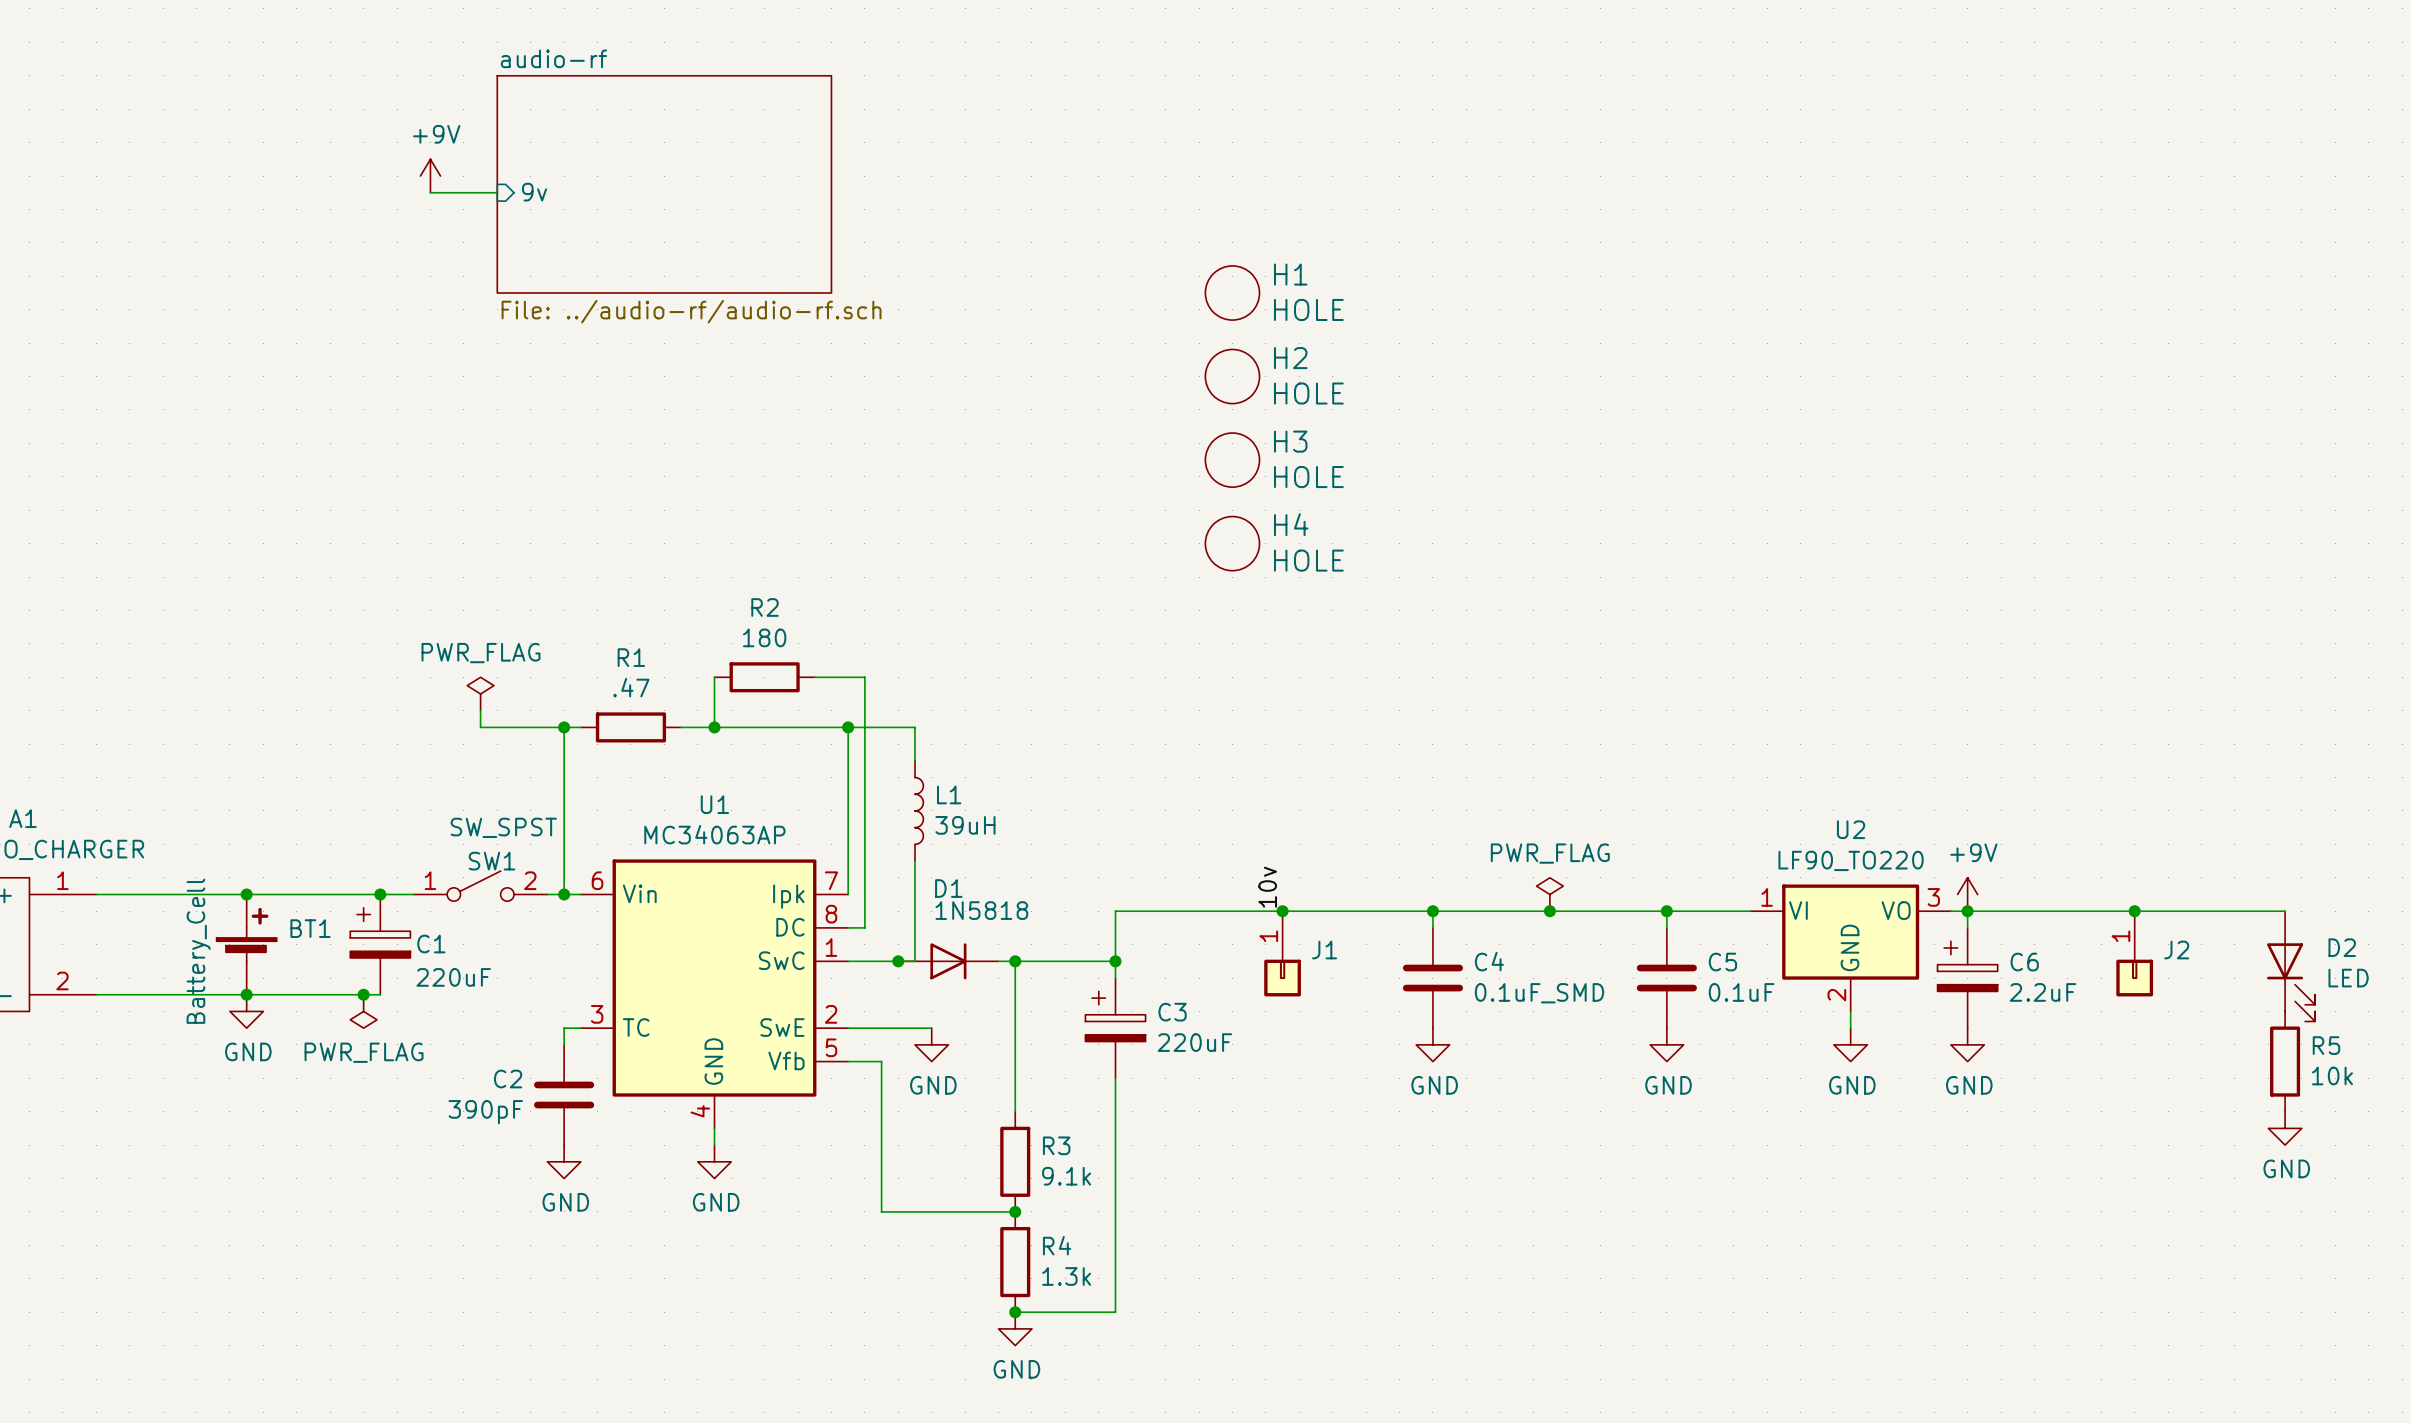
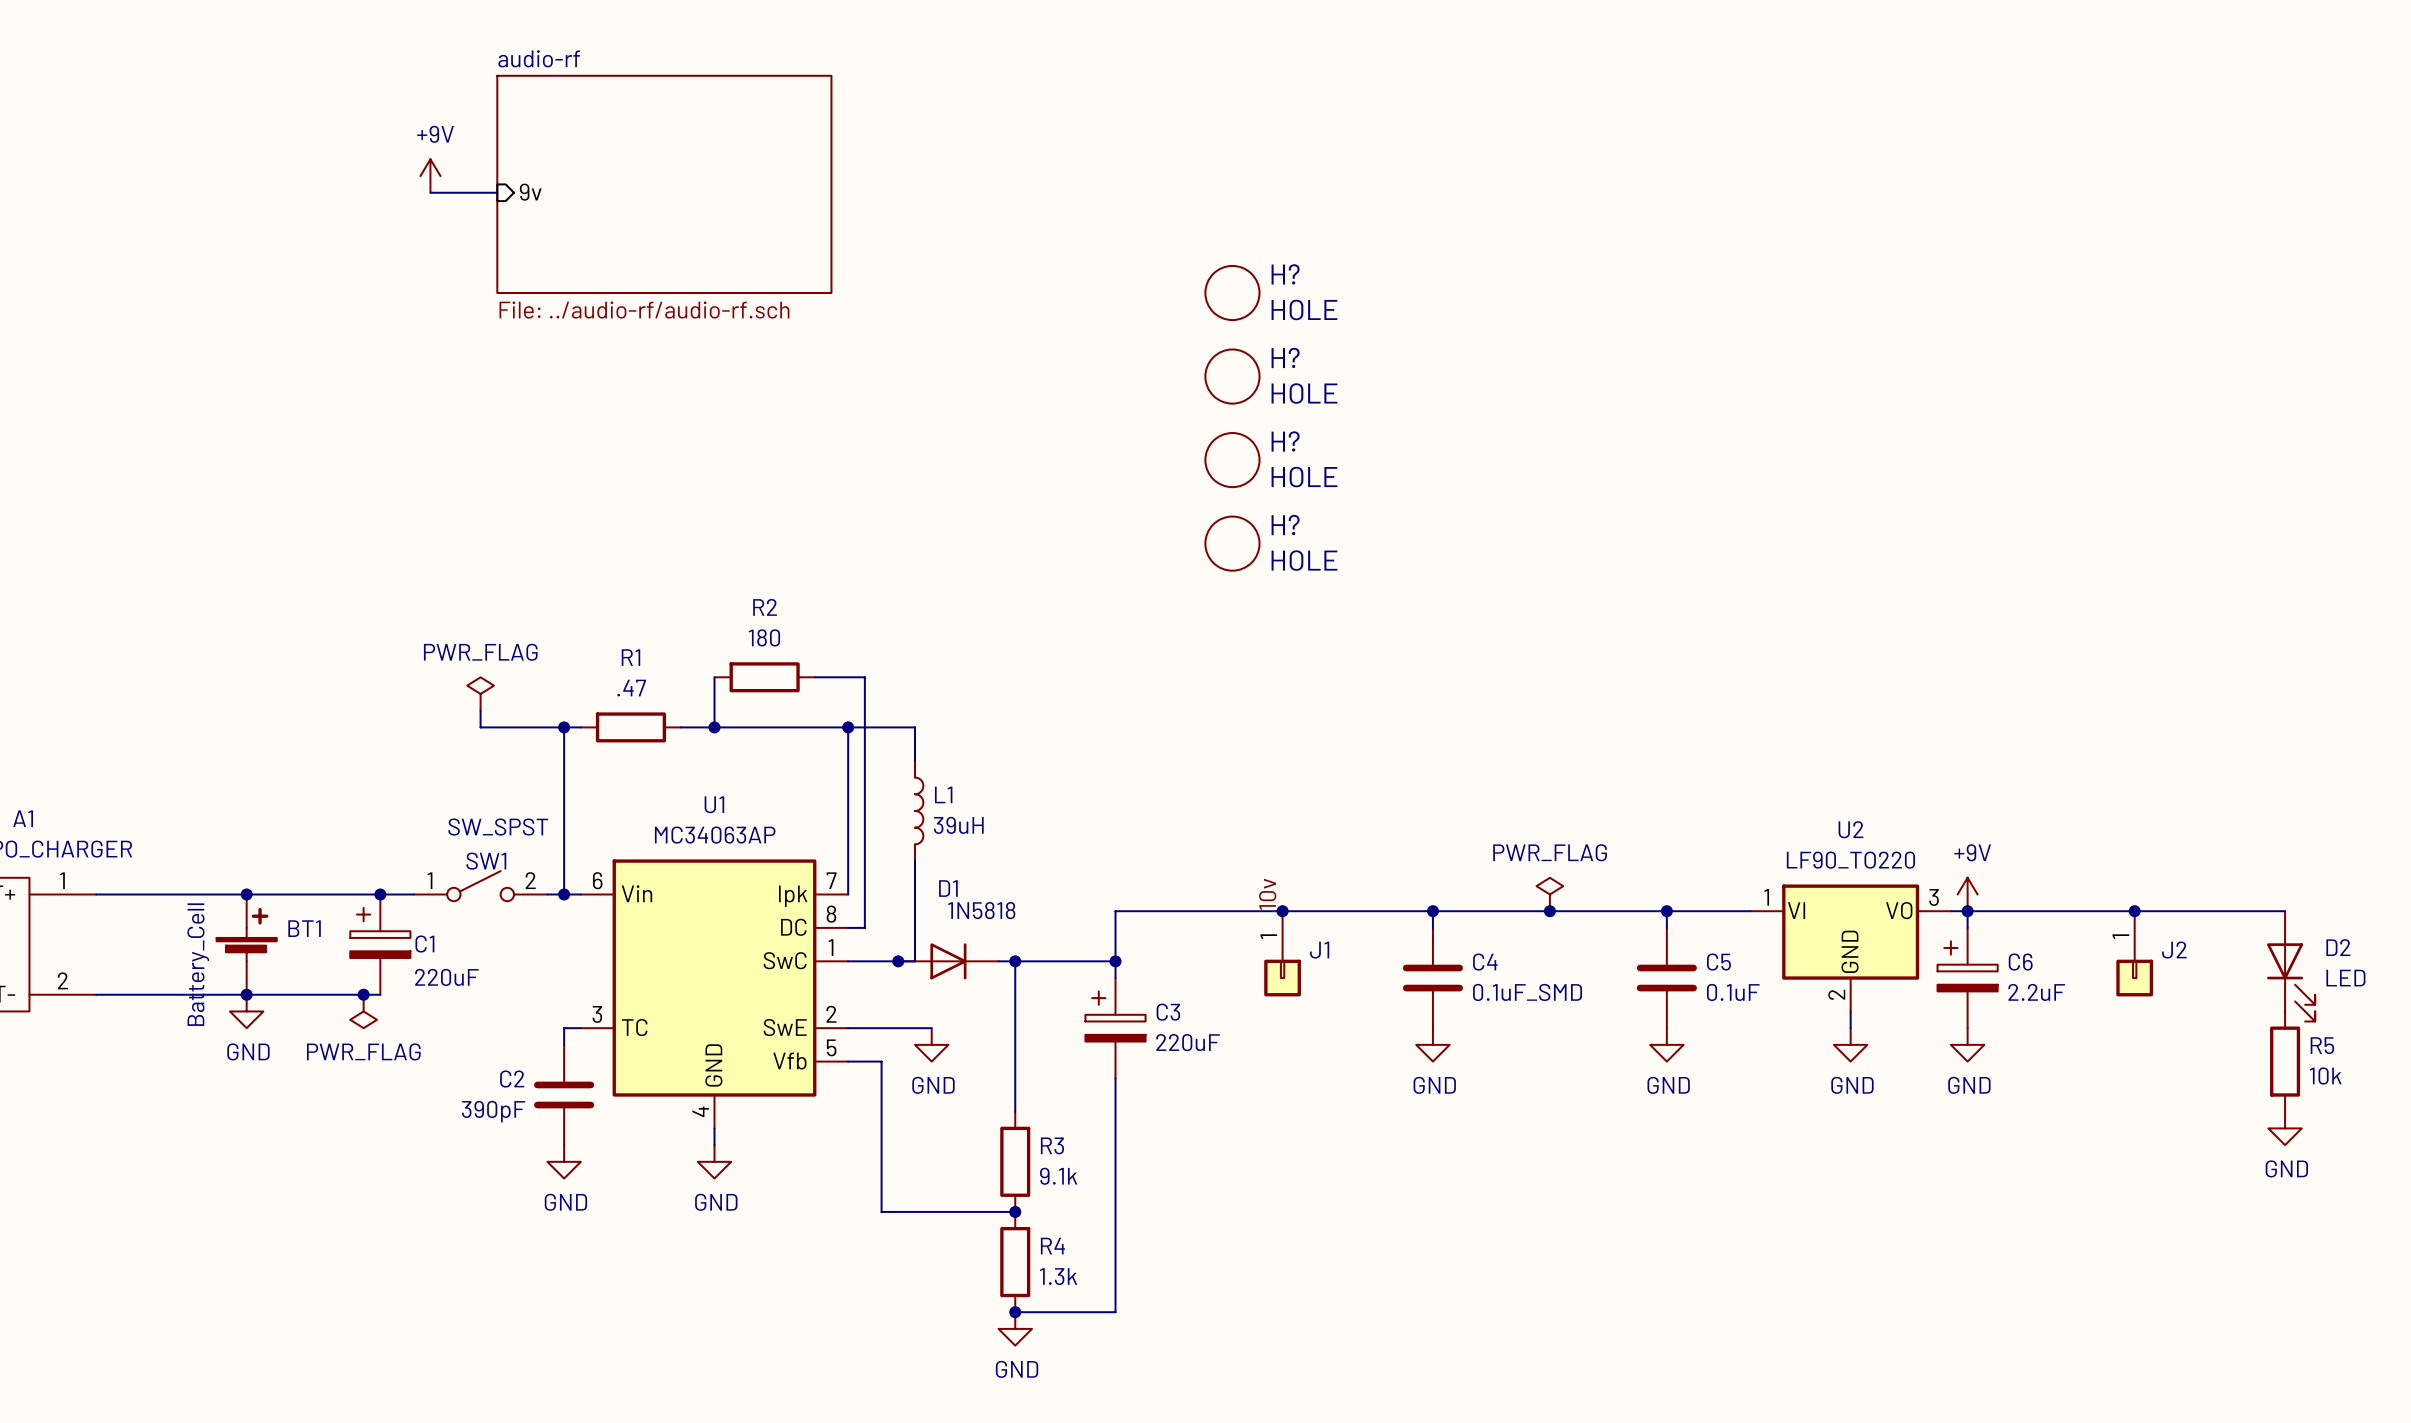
H1 name: H1 (1290, 274) -> H? (1285, 274)
H2 name: H2 (1290, 358) -> H? (1285, 357)
H3 name: H3 (1290, 441) -> H? (1285, 441)
H4 name: H4 (1291, 524) -> H? (1285, 525)

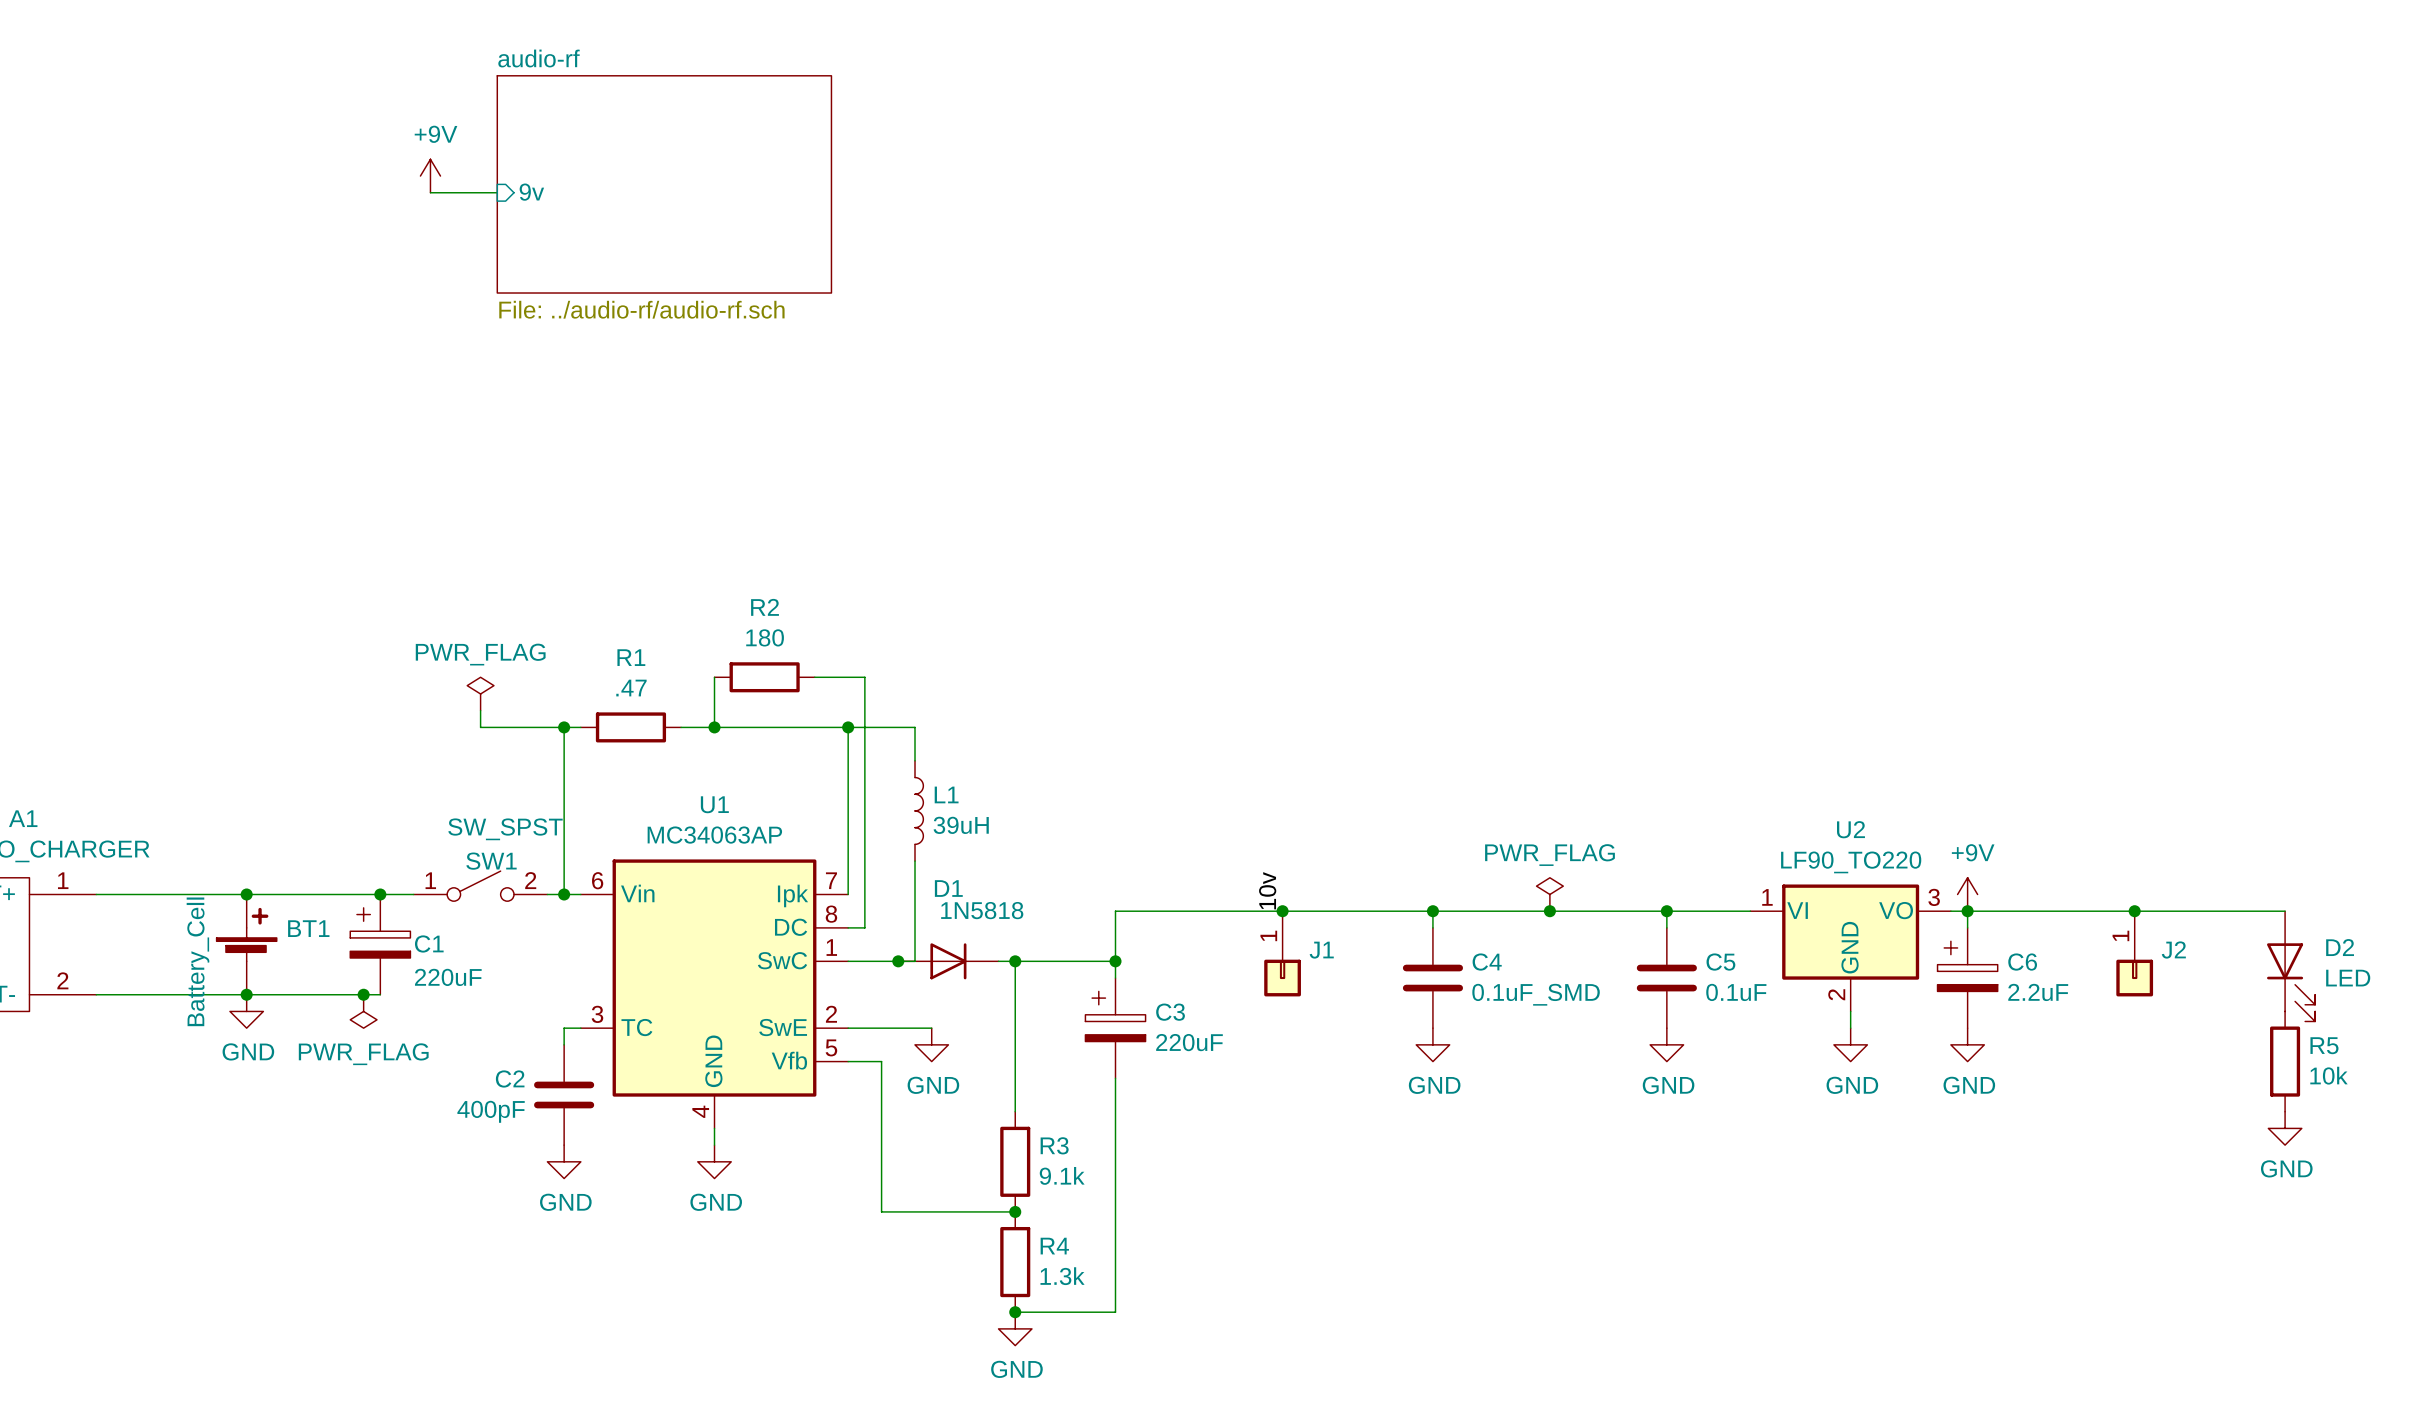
H?: HOLE (1232, 293) -> none
H?: HOLE (1232, 376) -> none
H?: HOLE (1232, 460) -> none
H?: HOLE (1232, 543) -> none
C2 value: 390pF (493, 1111) -> 400pF (491, 1111)

